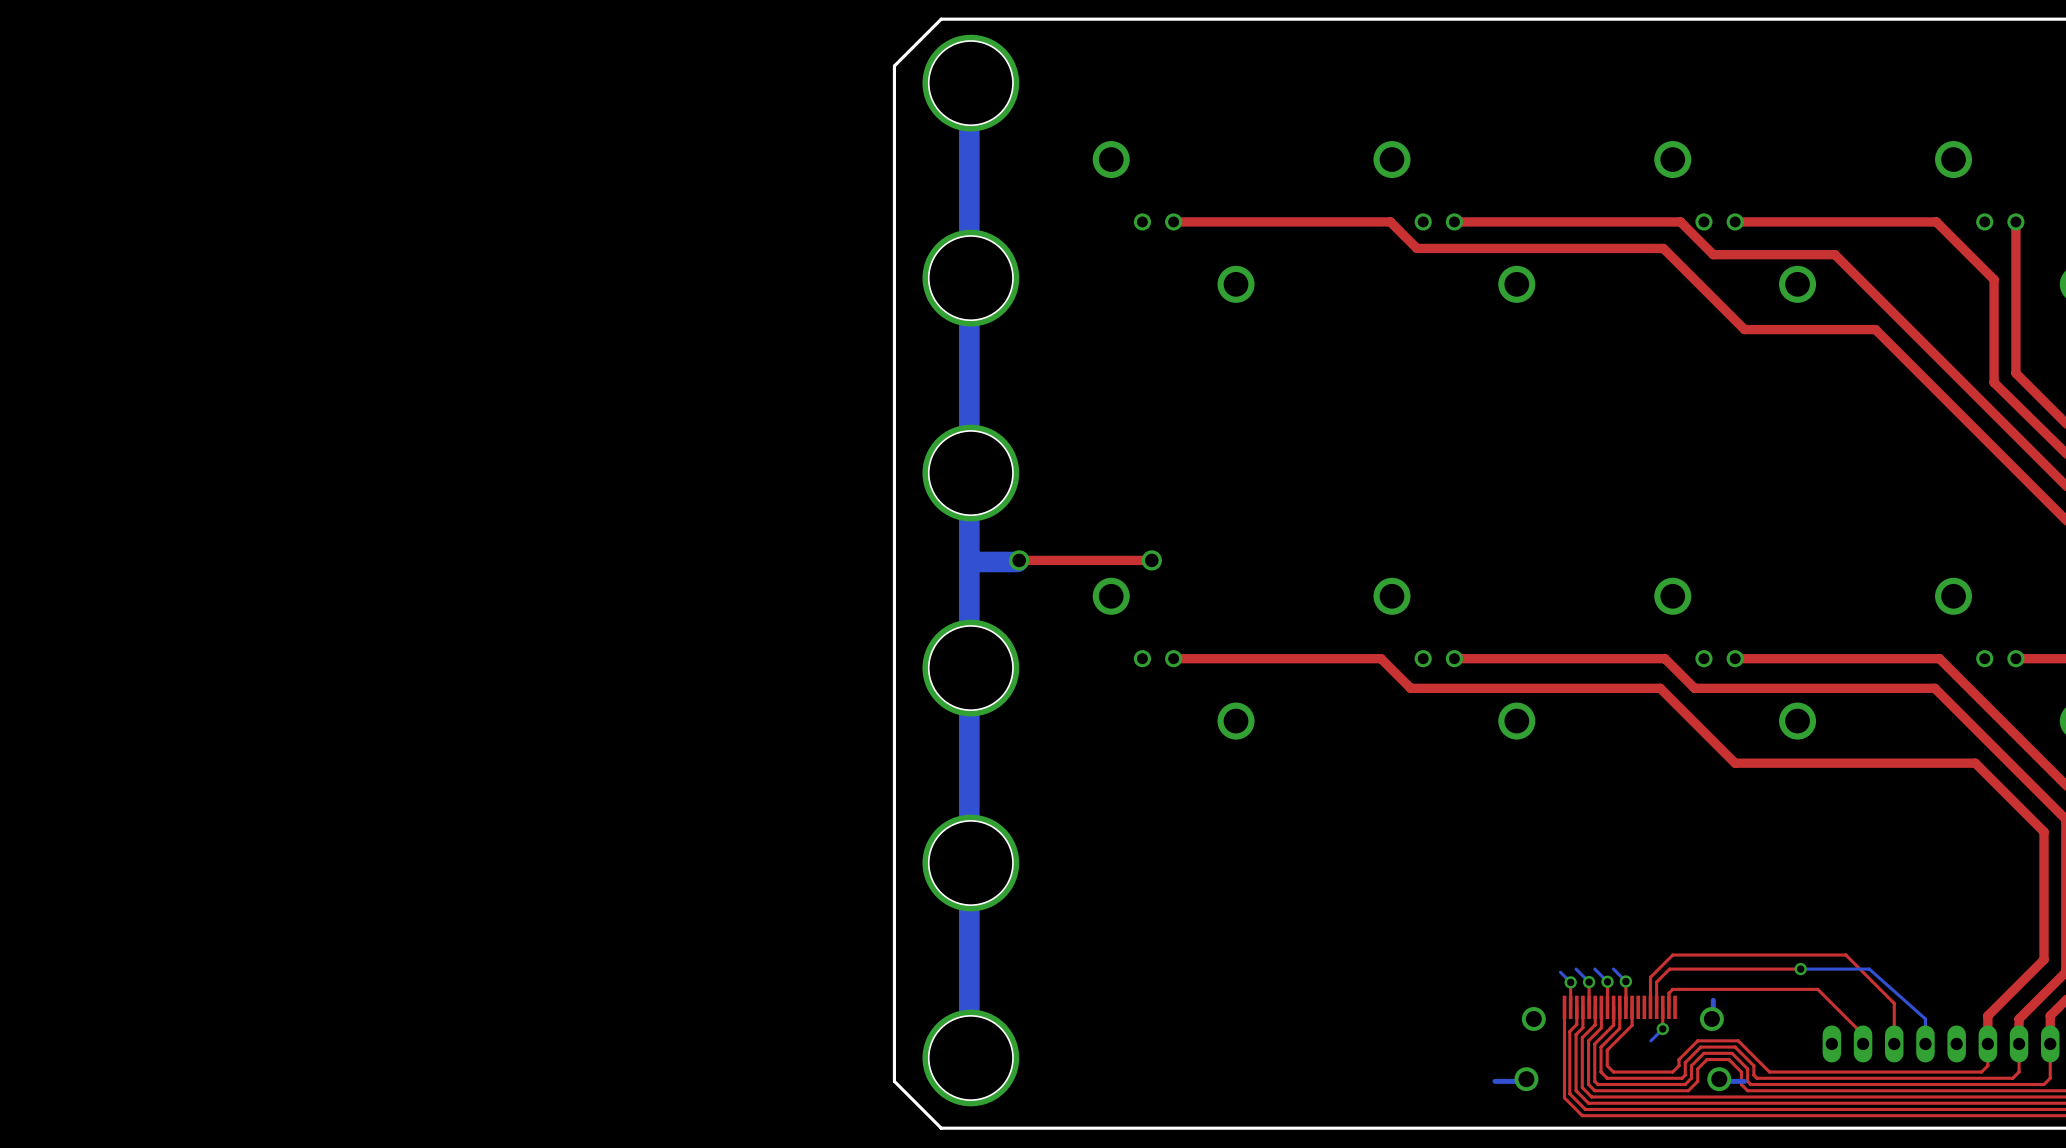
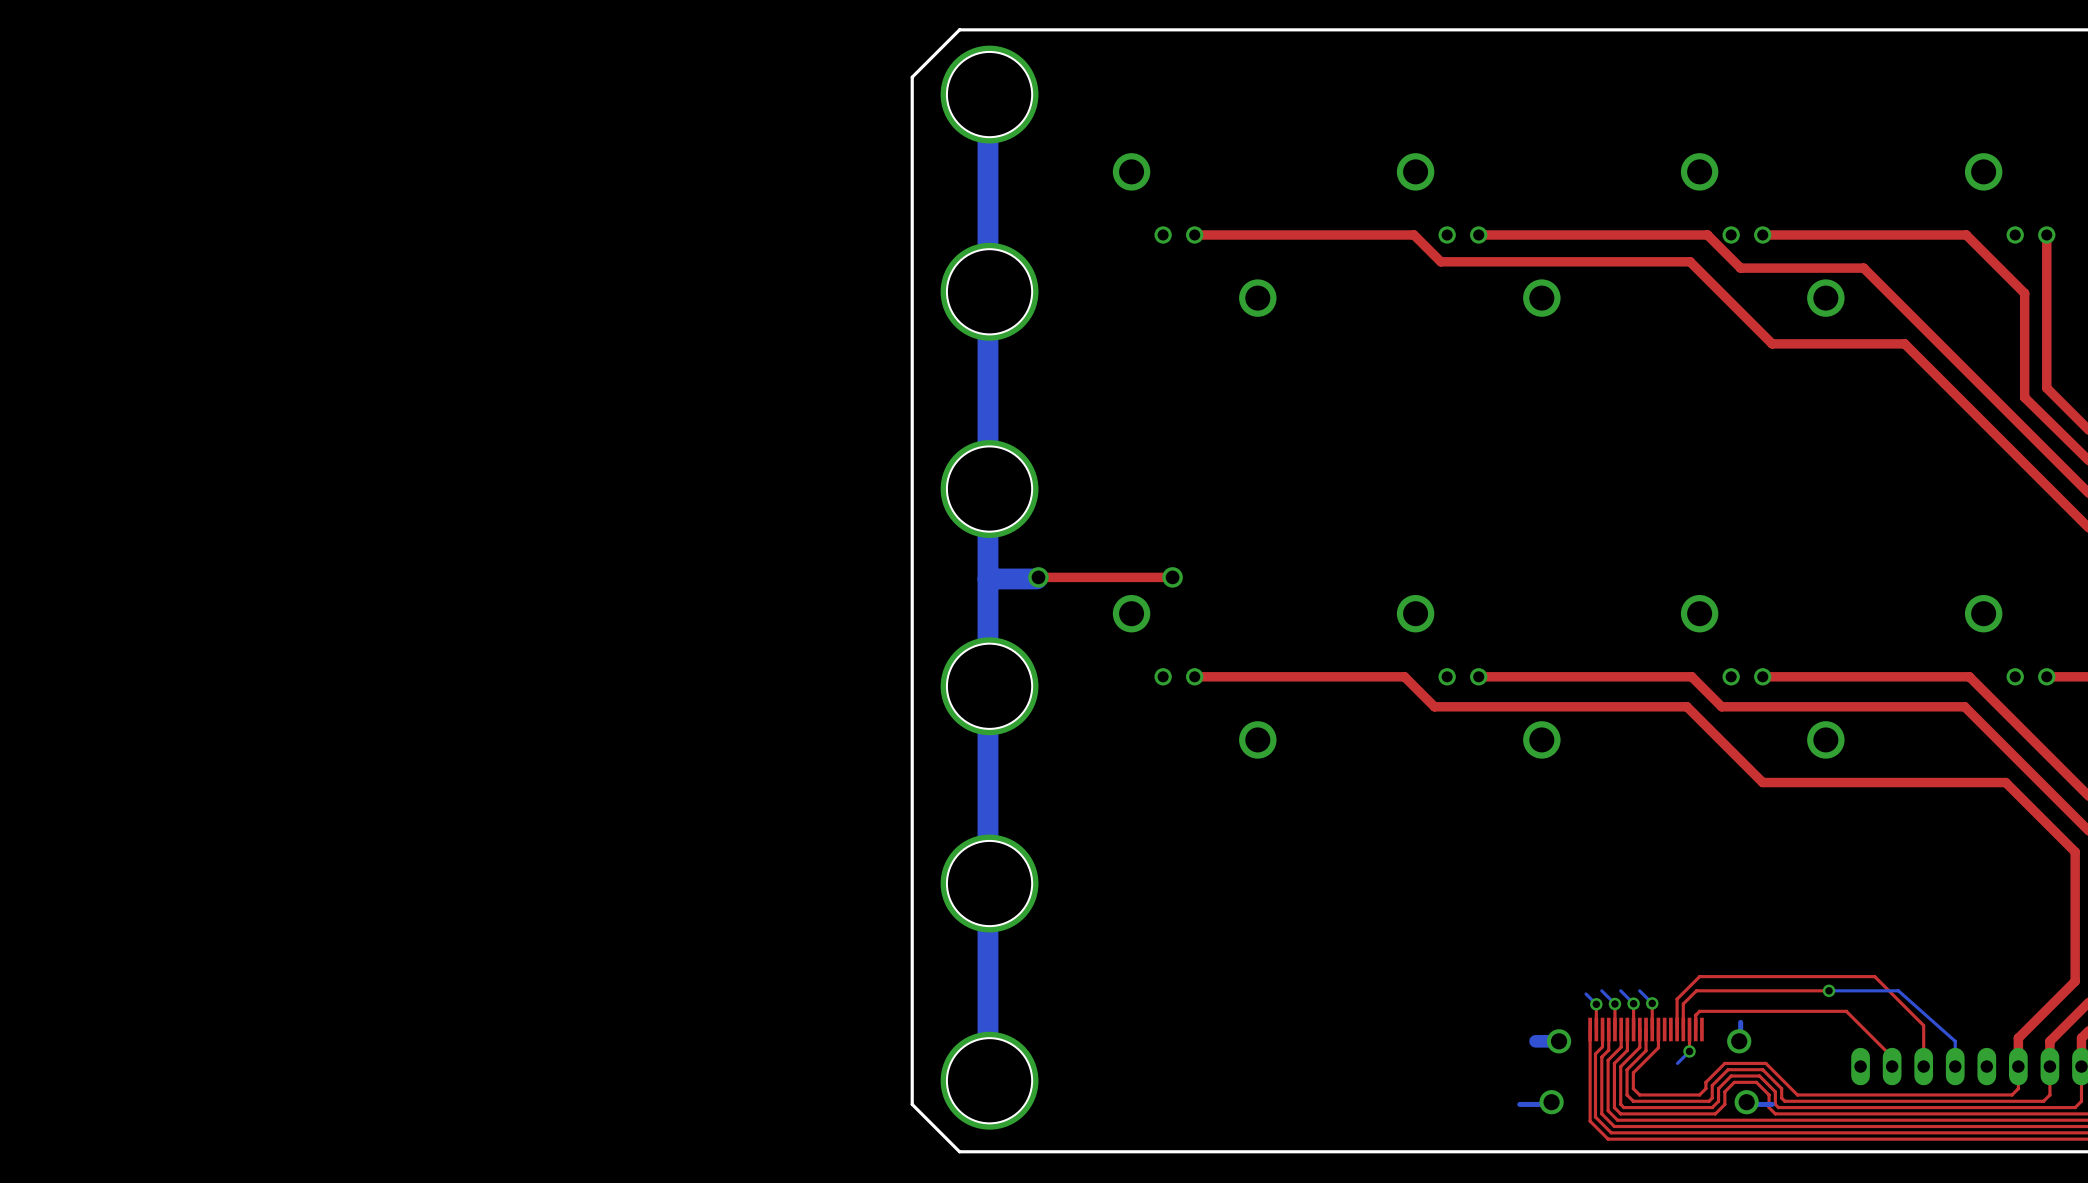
bottom track: none -> (1557, 1041) (1535, 1041)

